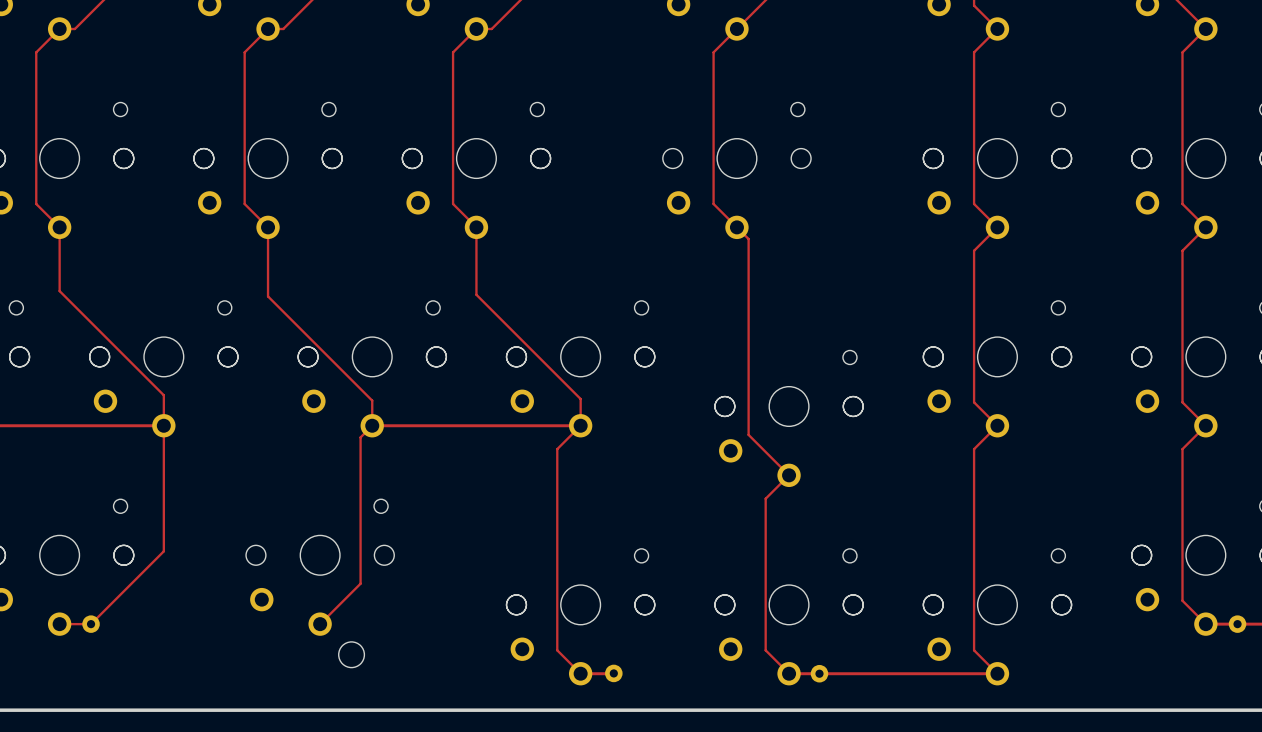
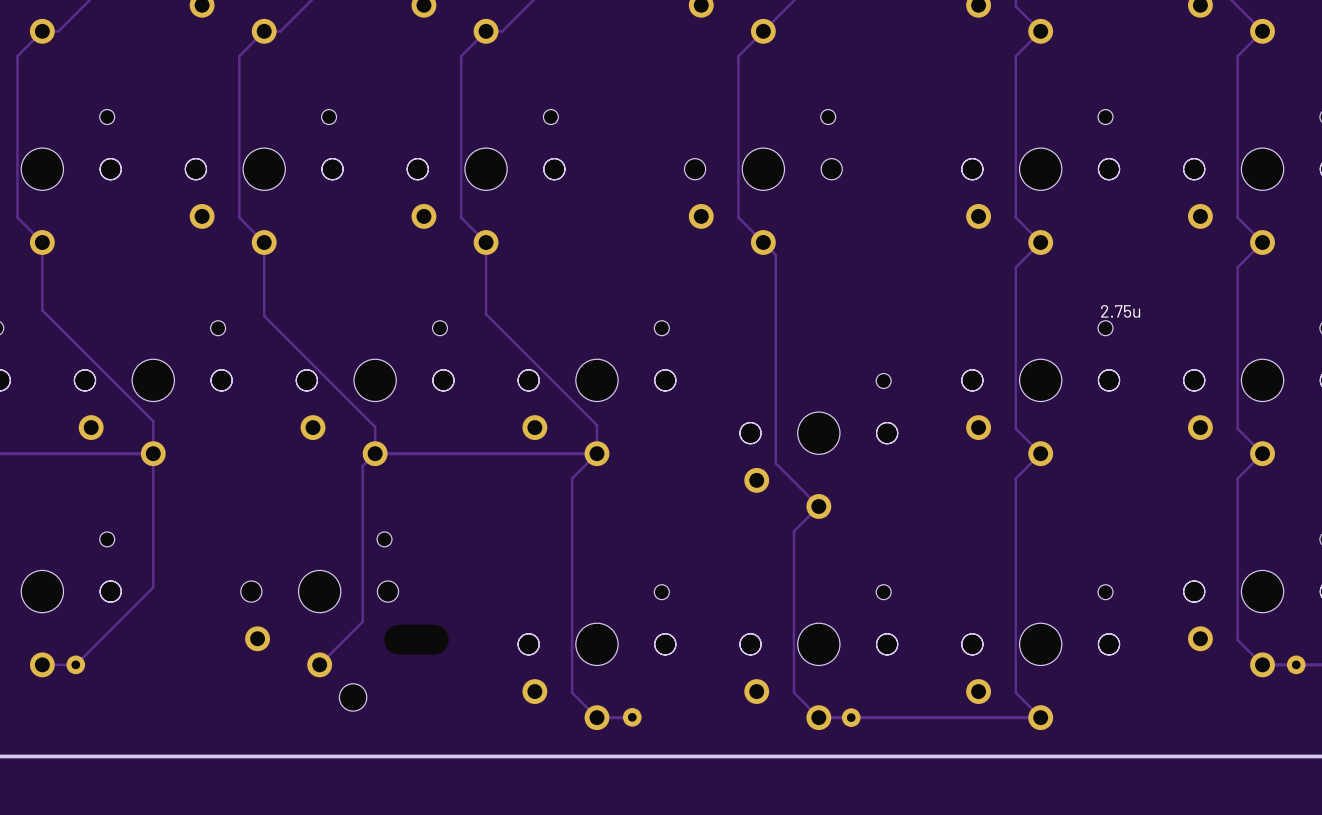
text: none -> 2.75u (1120, 311)

